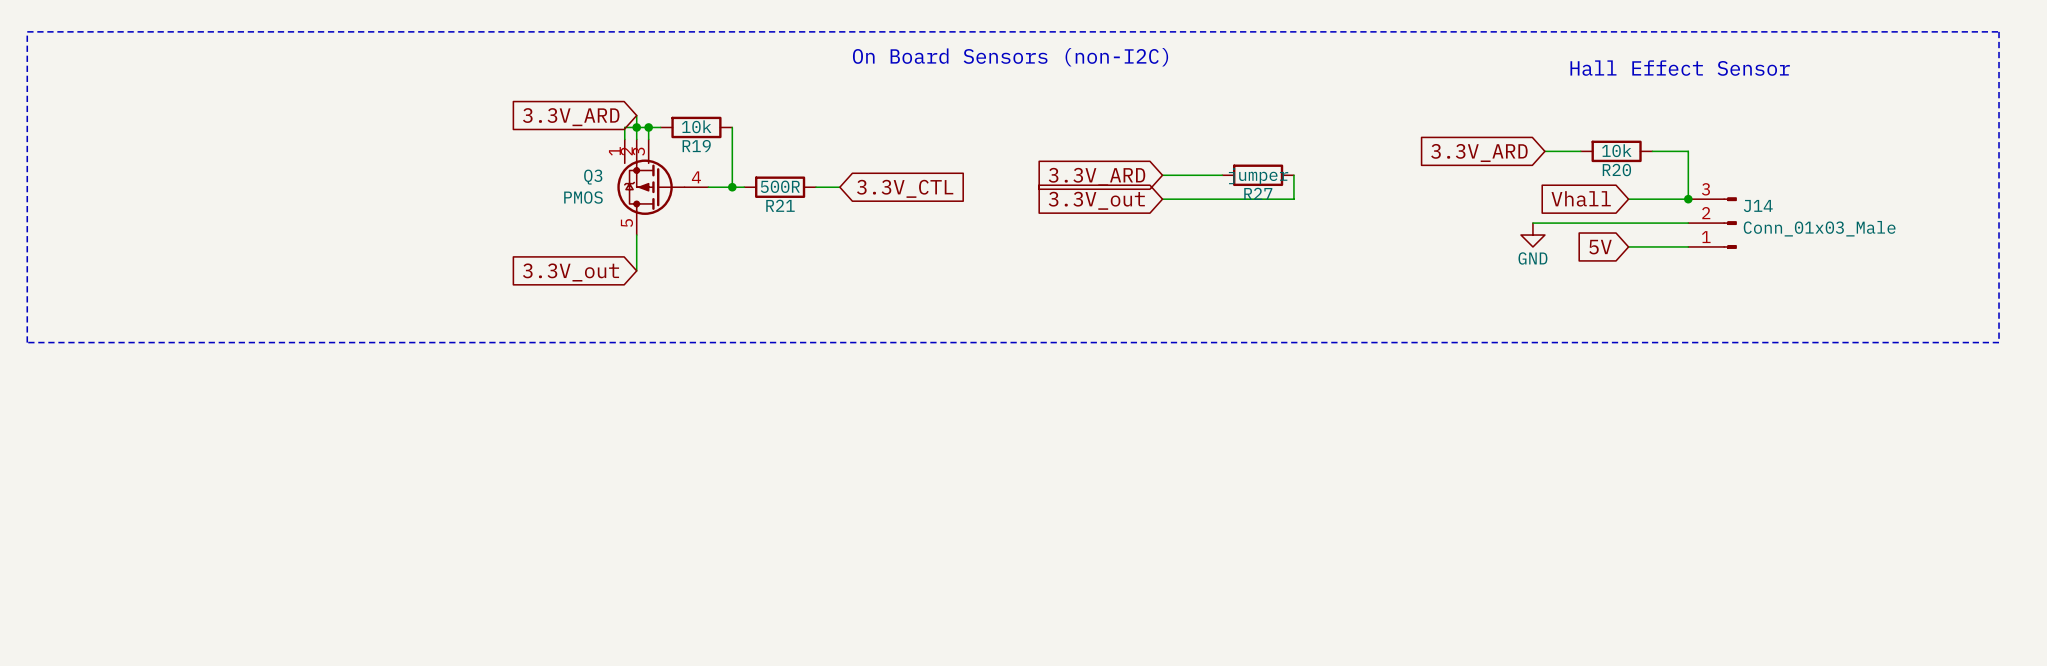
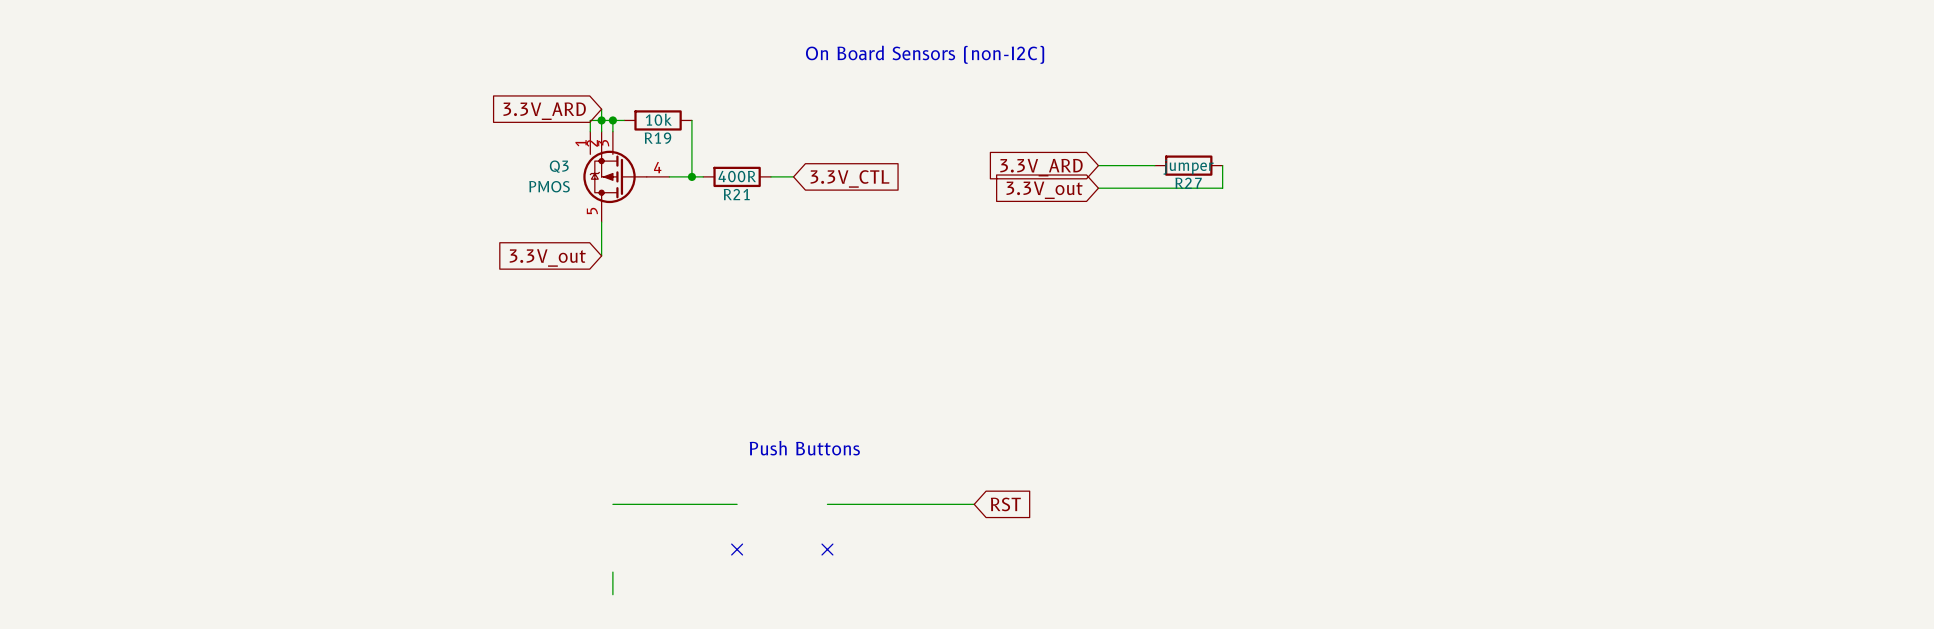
line: (27, 31) (27, 342) (1999, 342) (1999, 31) (27, 31) -> none
text: Hall Effect Sensor (1680, 68) -> none
wire: (1544, 151) (1580, 151) -> none
R20: 10k (1616, 151) -> none
wire: (1652, 151) (1688, 151) (1688, 199) (1628, 199) -> none
global label: 3.3V_ARD (1479, 152) -> none
R21 value: 500R (780, 186) -> 400R (737, 176)
global label: Vhall (1581, 198) -> none
junction: (1688, 199) -> none
wire: (1532, 223) (1688, 223) -> none
J14: Conn_01x03_Male (1712, 223) -> none
power symbol: GND (1532, 235) -> none
wire: (1628, 246) (1688, 246) -> none
global label: 5V (1600, 247) -> none
text: none -> Push Buttons (804, 448)
wire: none -> (612, 504) (737, 504)
wire: none -> (827, 504) (974, 504)
global label: none -> RST (1005, 504)
no-connect mark: none -> (737, 549)
no-connect mark: none -> (827, 549)
wire: none -> (612, 572) (612, 594)

